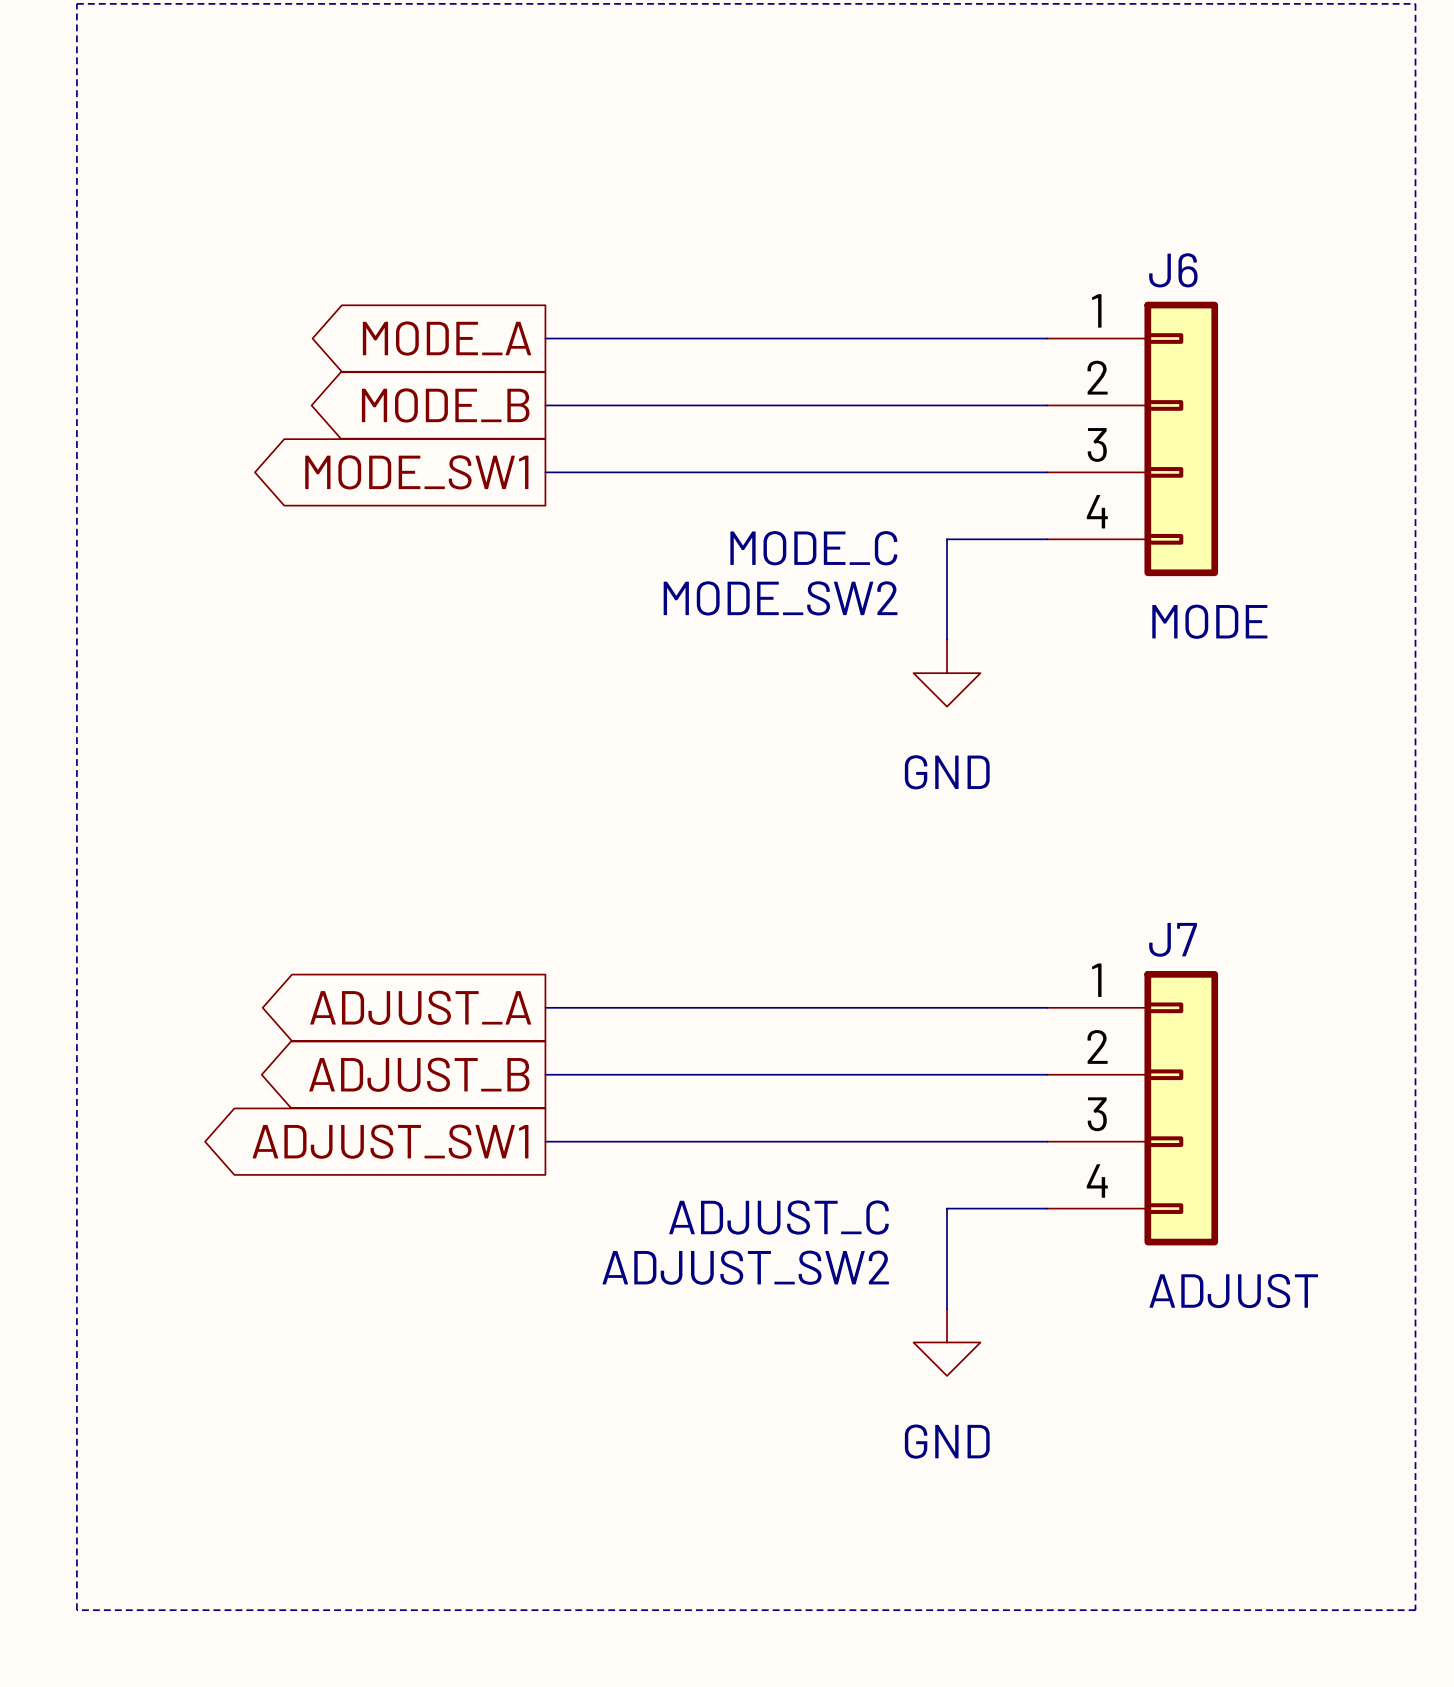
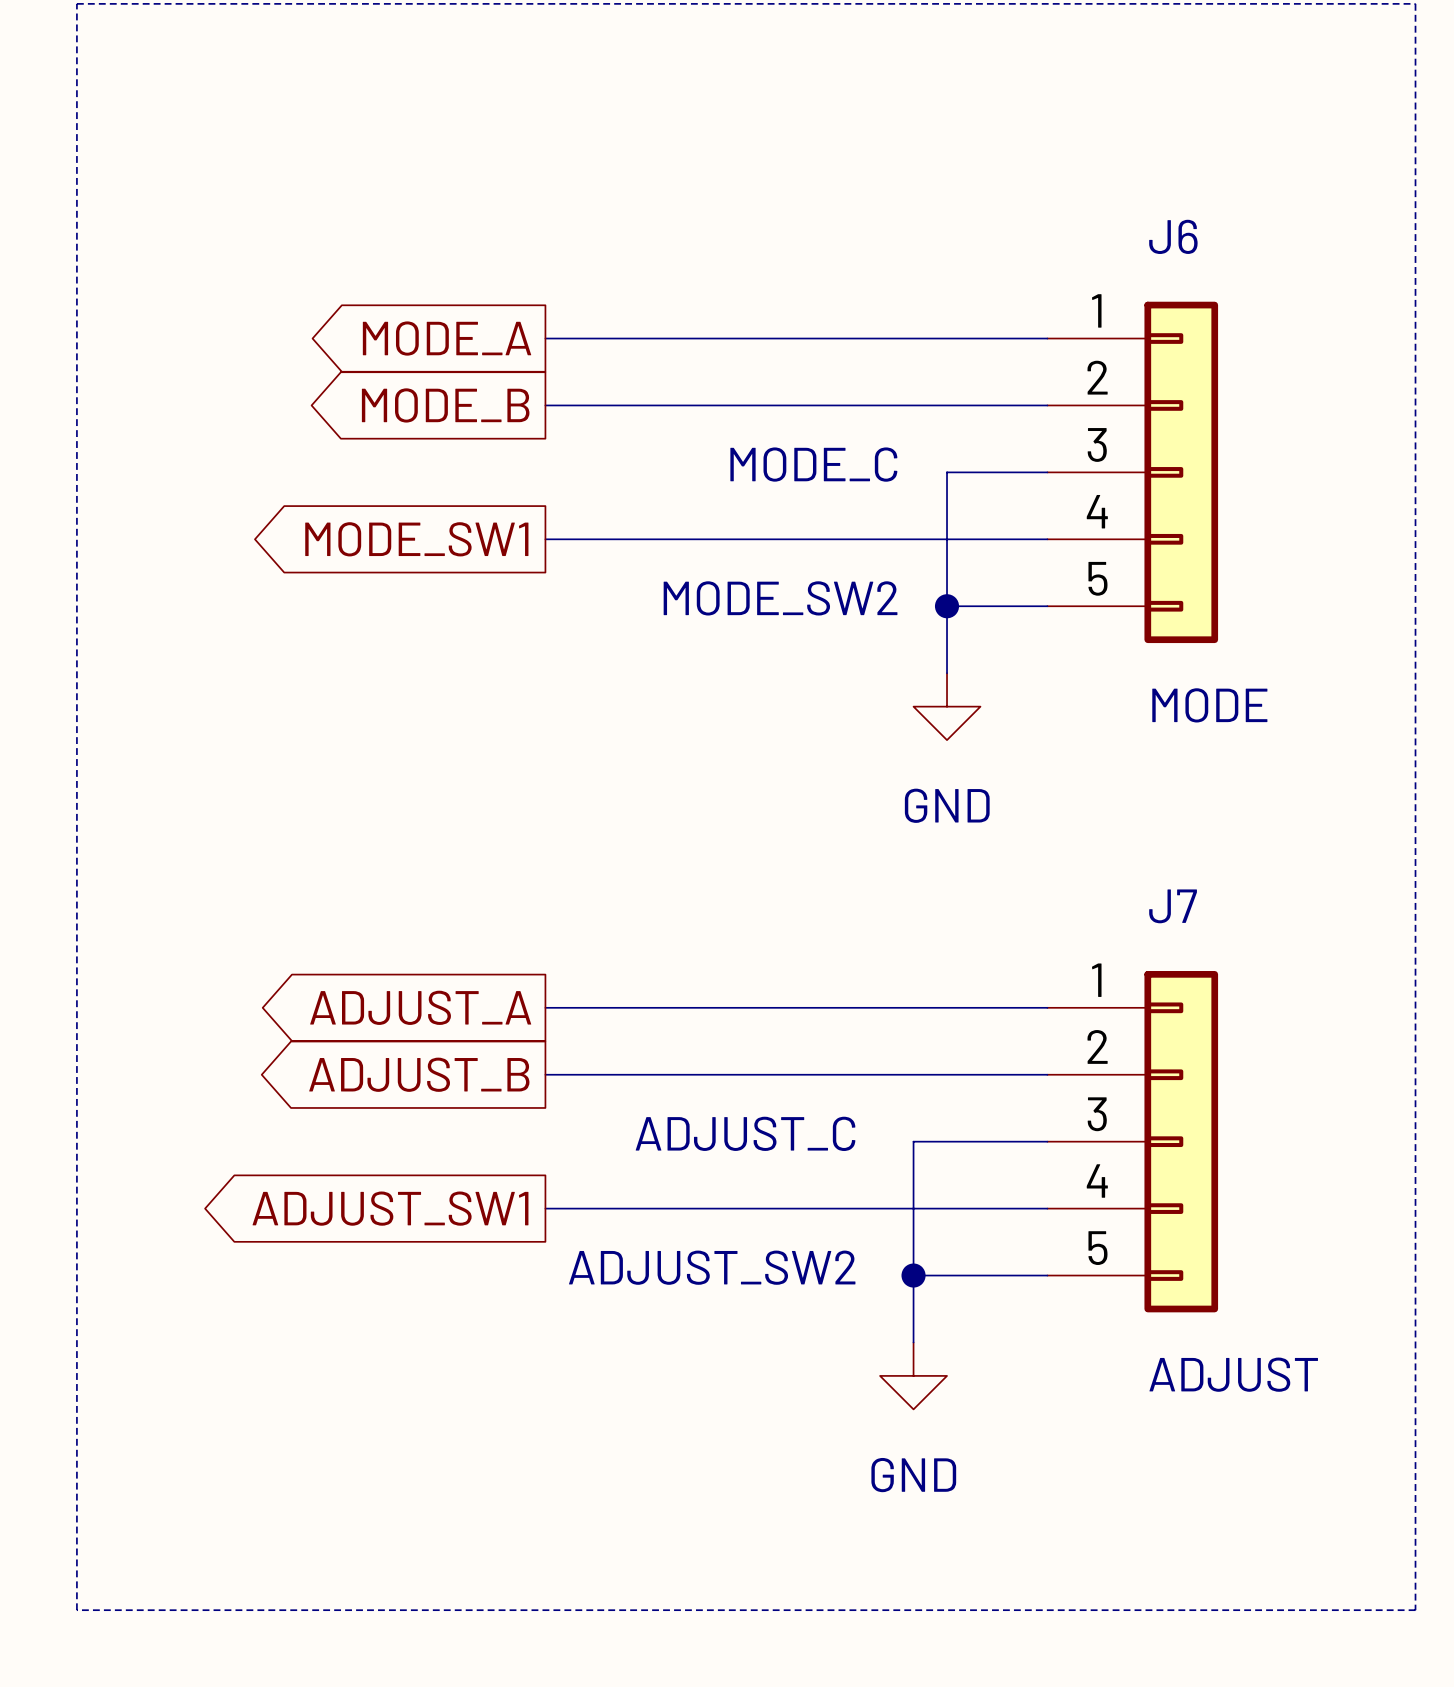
J6 name position: J6 (1173, 270) -> J6 (1173, 236)
J6 symbol: [1047, 301, 1219, 577] -> [1047, 301, 1219, 644]
global label position: MODE_SW1 (416, 472) -> MODE_SW1 (416, 539)
wire: (545, 472) (947, 472) -> (545, 539) (947, 539) (947, 472)
text position: MODE_C (813, 548) -> MODE_C (813, 464)
wire: none -> (947, 606) (1047, 606)
junction: none -> (947, 606)
power symbol position: GND (947, 673) -> GND (947, 706)
J7 name position: J7 (1173, 939) -> J7 (1173, 906)
J7 symbol: [1047, 971, 1219, 1246] -> [1047, 971, 1219, 1313]
global label position: ADJUST_SW1 (390, 1141) -> ADJUST_SW1 (390, 1208)
wire: (545, 1141) (913, 1141) -> (913, 1342) (913, 1141)
wire: (947, 1208) (947, 1309) -> (947, 1208) (545, 1208)
text position: ADJUST_C (778, 1217) -> ADJUST_C (745, 1133)
text position: ADJUST_SW2 (745, 1267) -> ADJUST_SW2 (712, 1267)
wire: none -> (913, 1275) (1047, 1275)
junction: none -> (913, 1275)
power symbol position: GND (947, 1342) -> GND (913, 1375)

